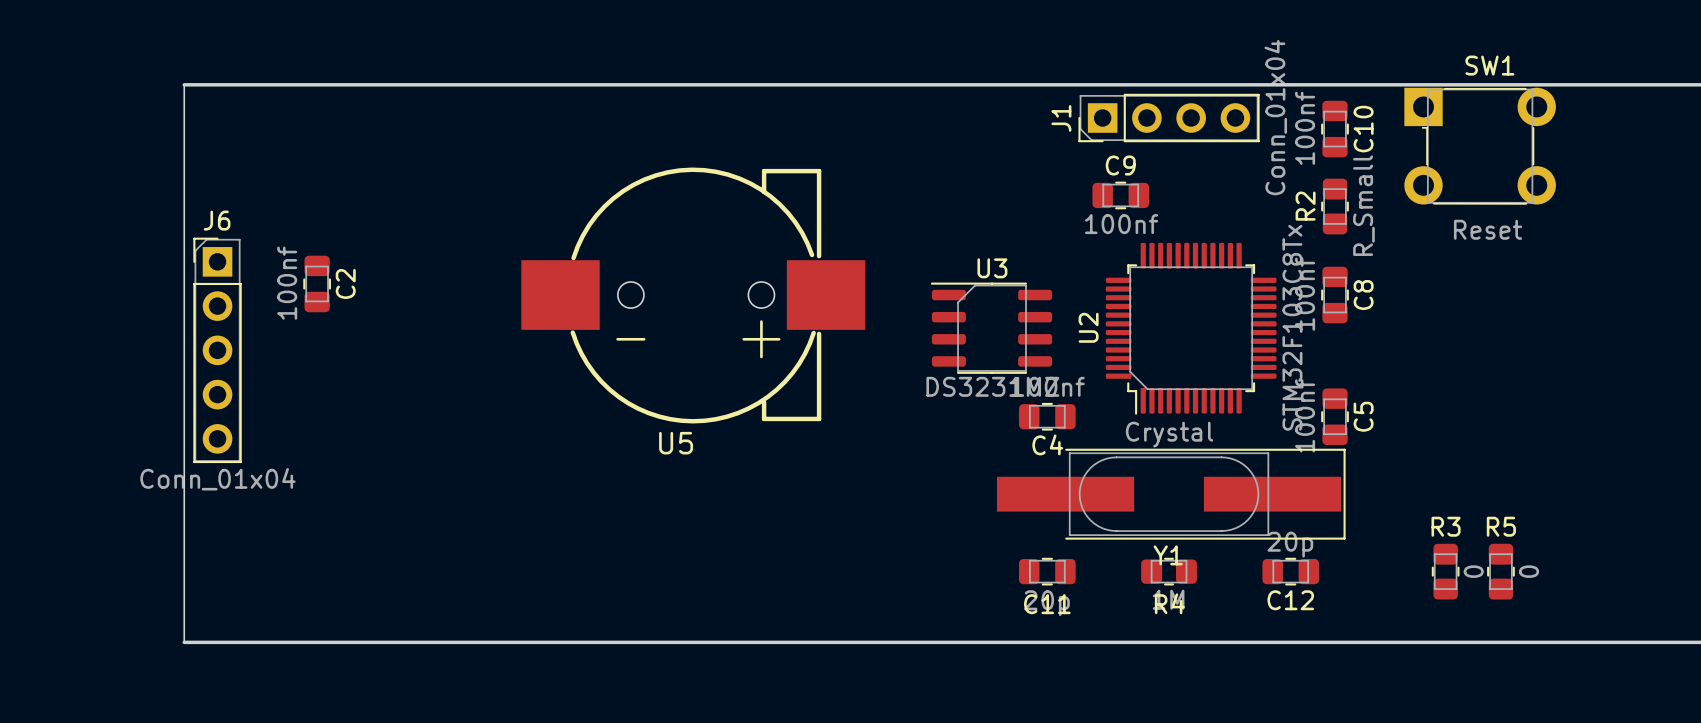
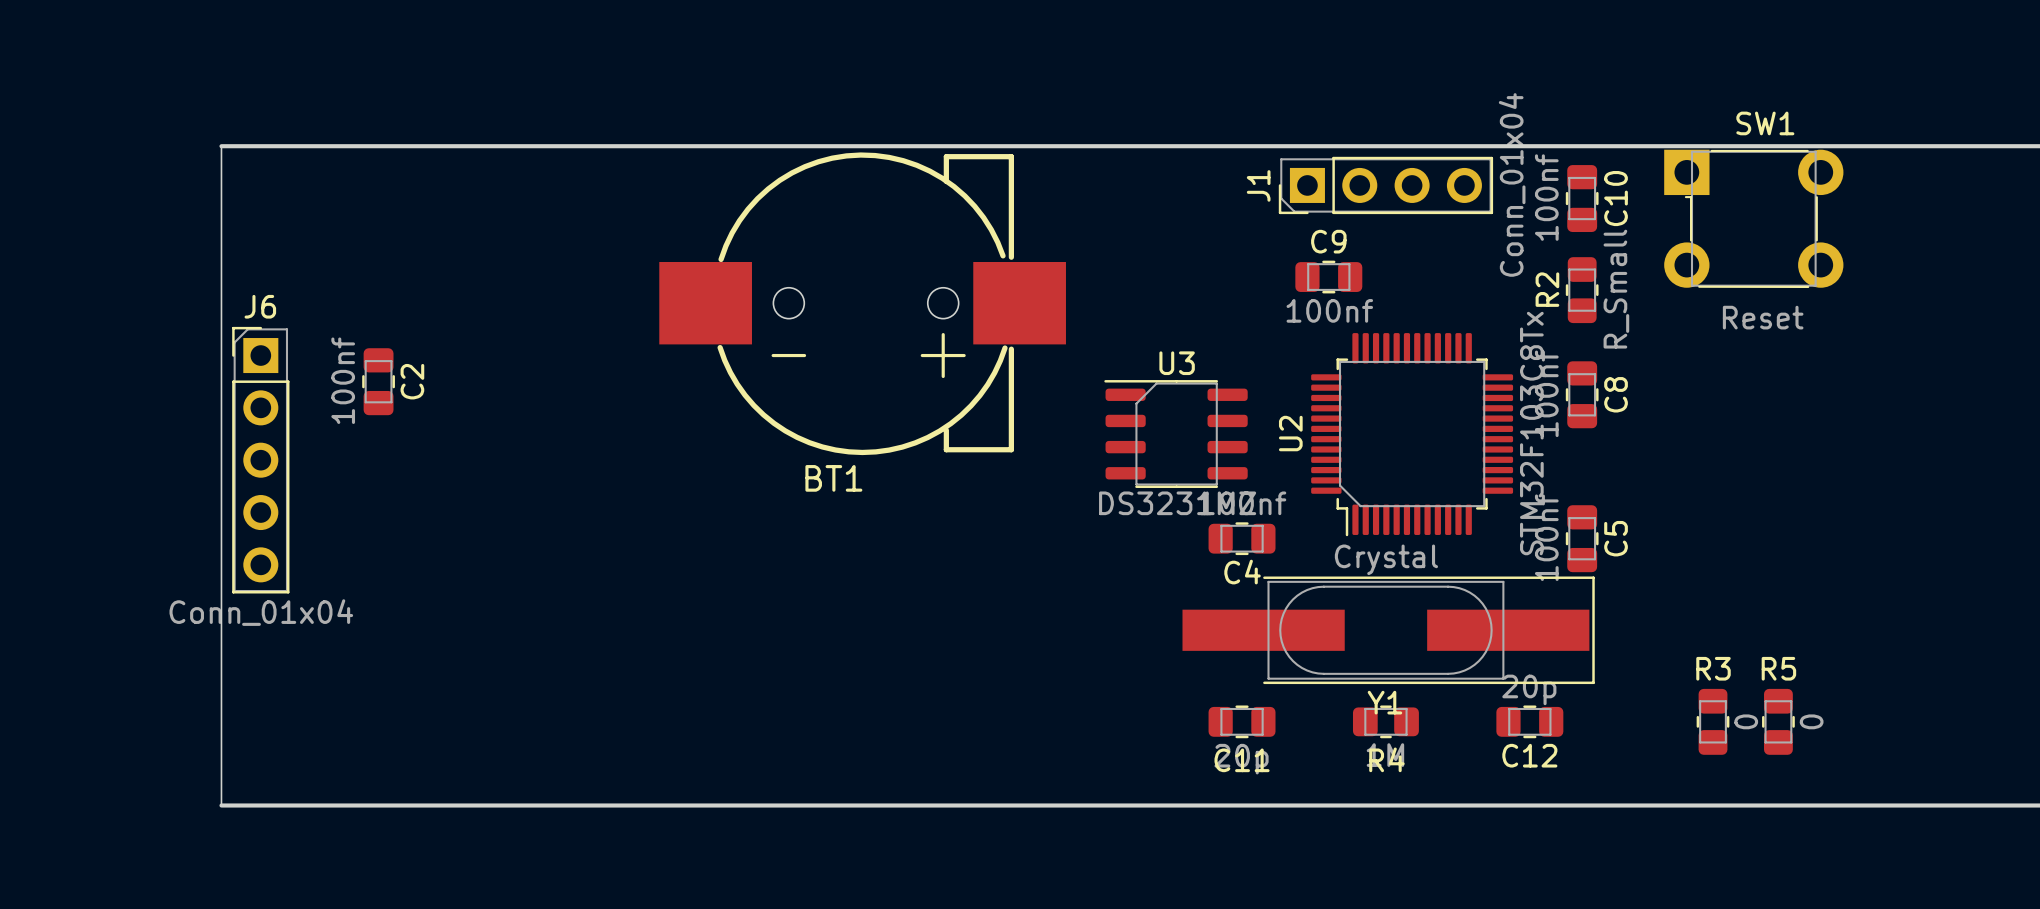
BT1: none -> (862, 303)
U5: (693, 295) -> none

